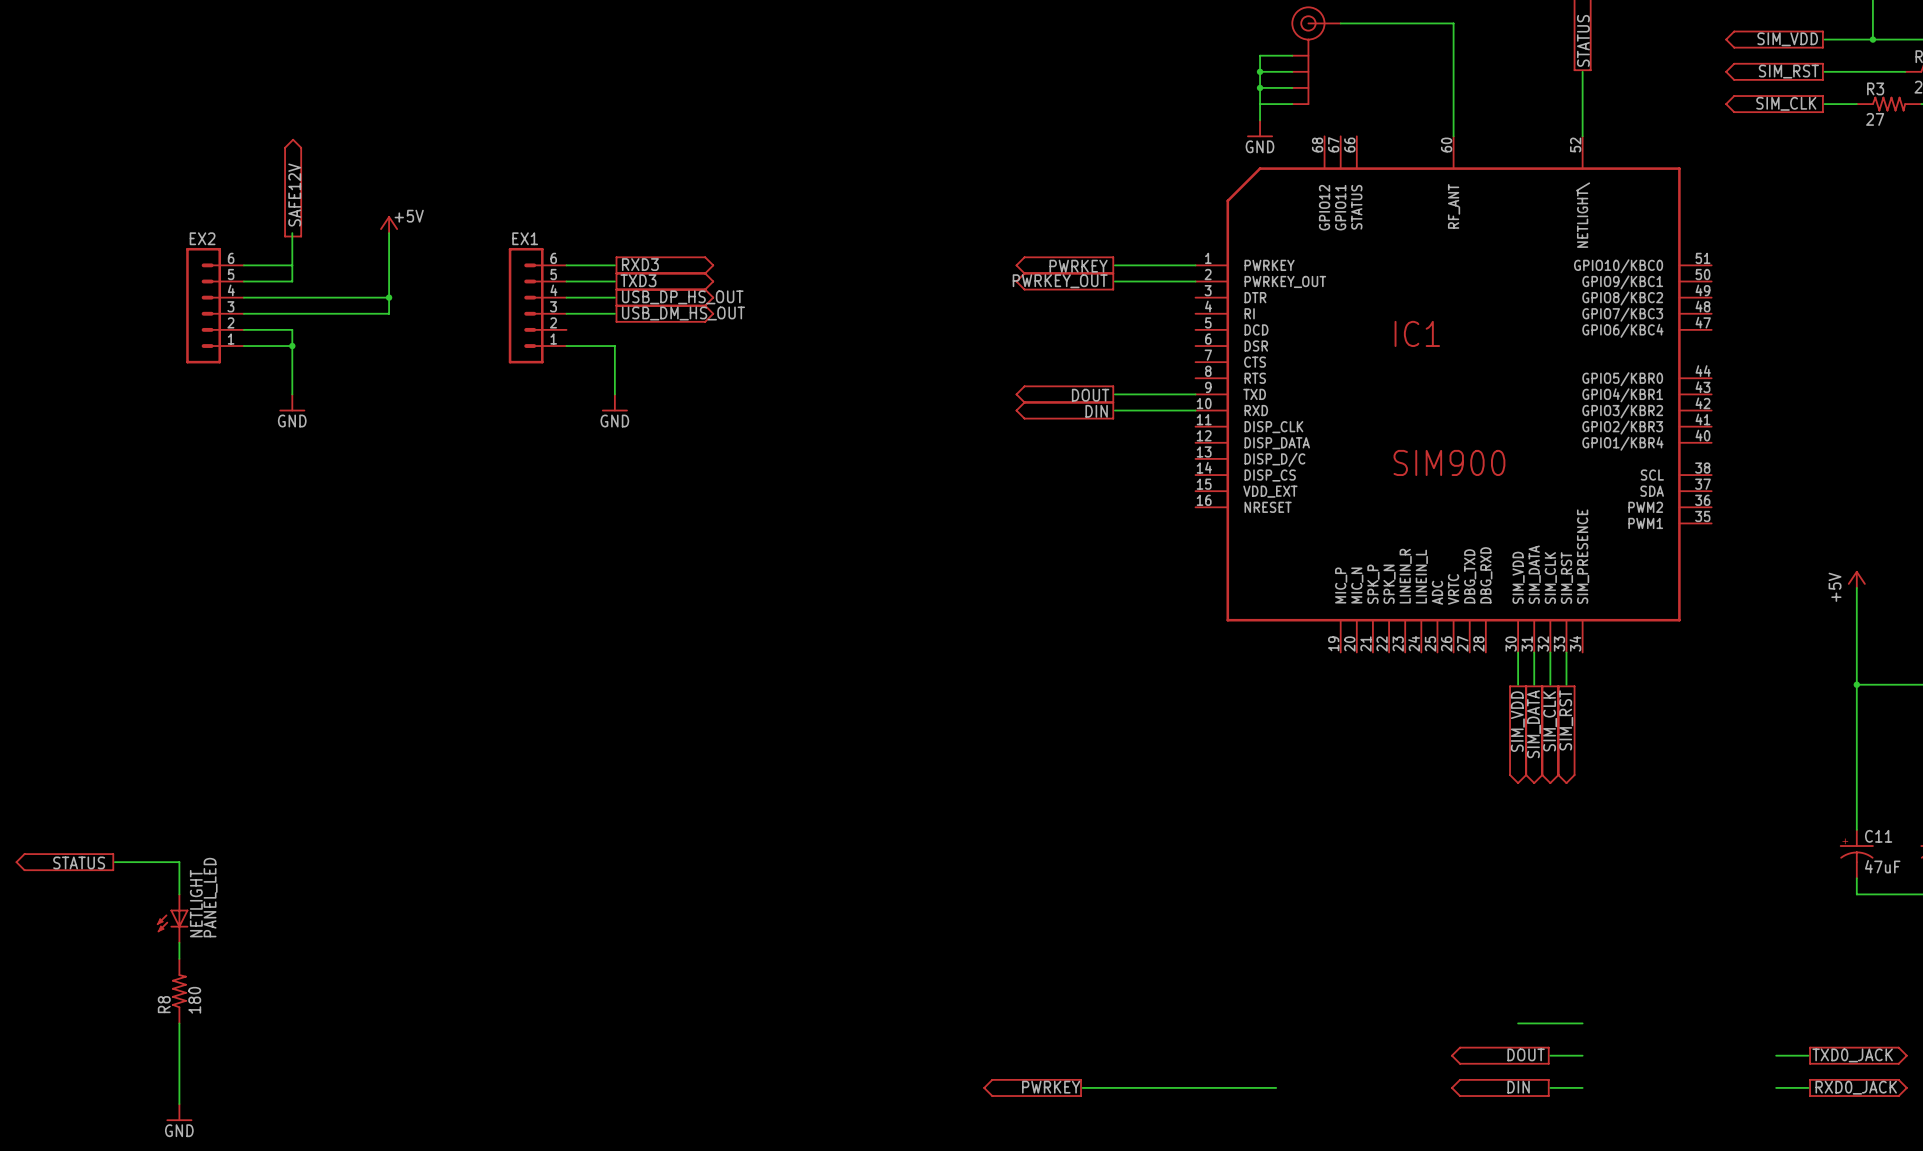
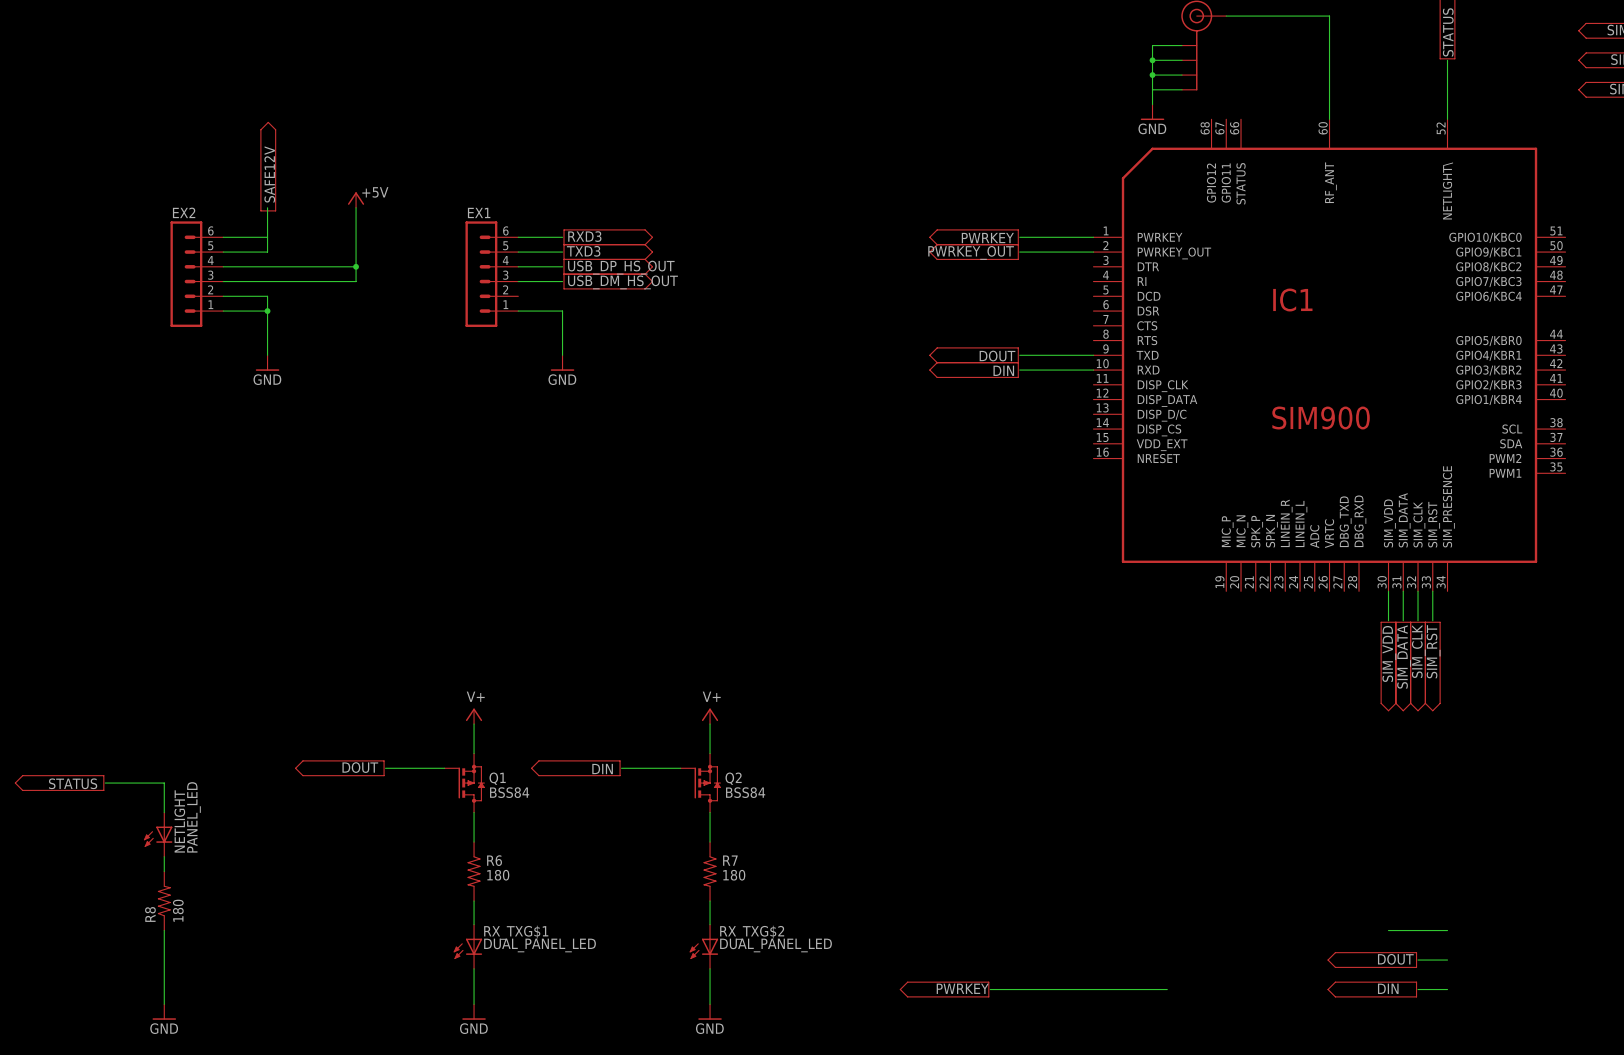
power symbol: none -> V+ (474, 716)
power symbol: none -> V+ (710, 716)
wire: none -> (474, 724) (474, 753)
wire: none -> (710, 724) (710, 753)
label: none -> DOUT (360, 767)
part: none -> (339, 768)
wire: none -> (385, 768) (444, 768)
part: none -> (575, 768)
label: none -> DIN (602, 769)
wire: none -> (621, 768) (680, 768)
Q1: none -> BSS84 (464, 783)
Q2: none -> BSS84 (700, 783)
wire: none -> (474, 812) (474, 842)
wire: none -> (710, 812) (710, 842)
R6: none -> 180 (474, 871)
R7: none -> 180 (710, 871)
wire: none -> (474, 901) (474, 924)
wire: none -> (710, 901) (710, 924)
RX_TXG$1: none -> DUAL_PANEL_LED (467, 946)
RX_TXG$2: none -> DUAL_PANEL_LED (703, 946)
wire: none -> (474, 968) (474, 1004)
wire: none -> (710, 968) (710, 1004)
power symbol: none -> GND (474, 1012)
power symbol: none -> GND (710, 1012)

